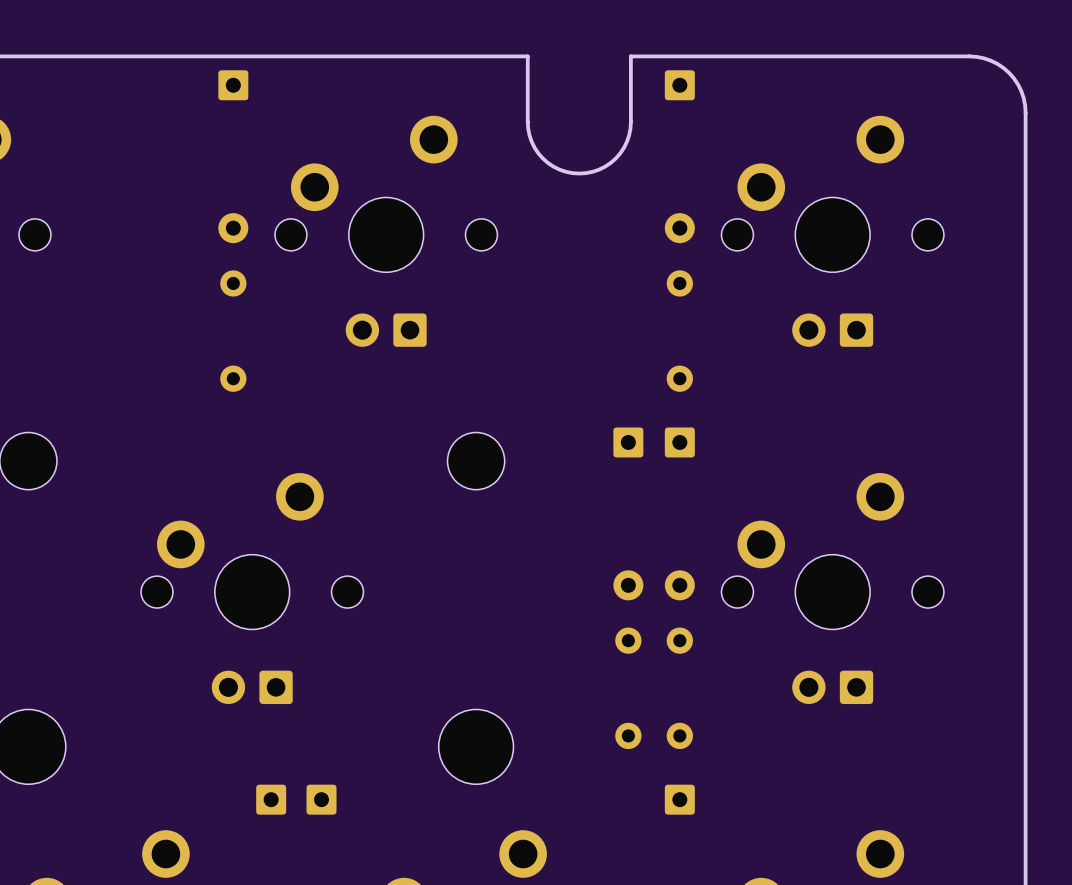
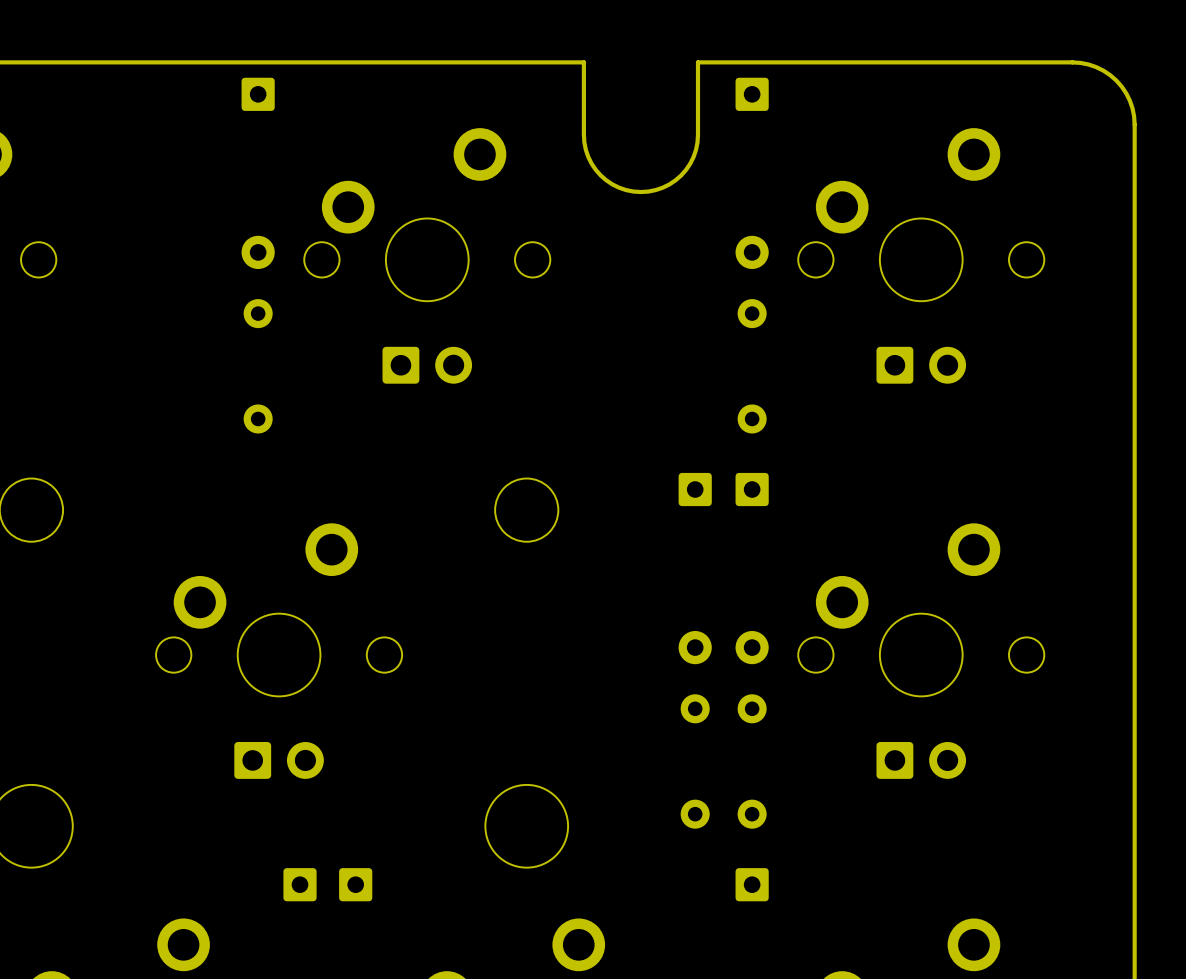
part rotation: 0° (386, 330) -> 180° (427, 365)
part rotation: 0° (832, 330) -> 180° (921, 365)
part rotation: 0° (252, 687) -> 180° (279, 760)
part rotation: 0° (832, 687) -> 180° (921, 760)

